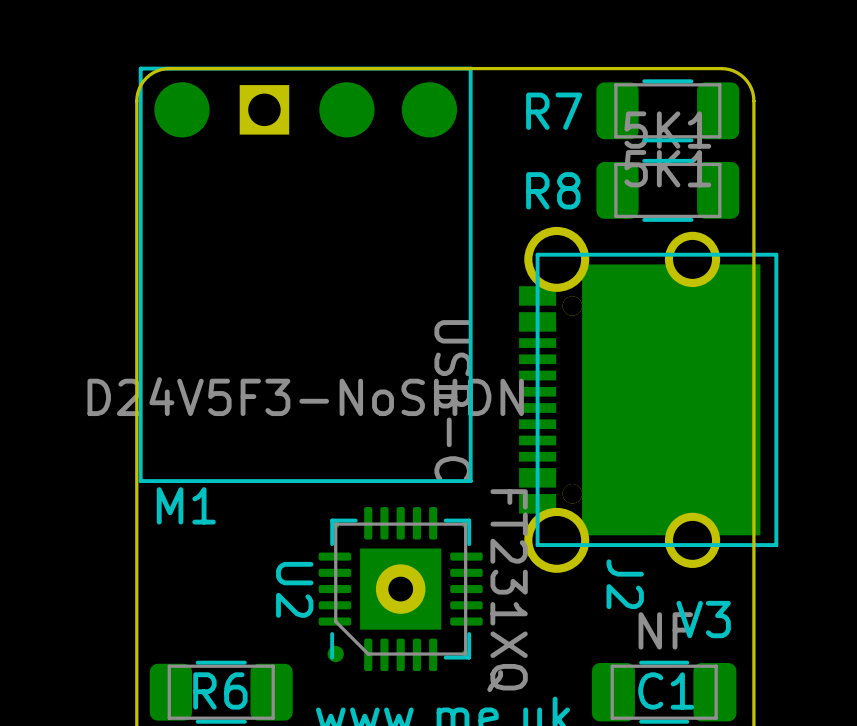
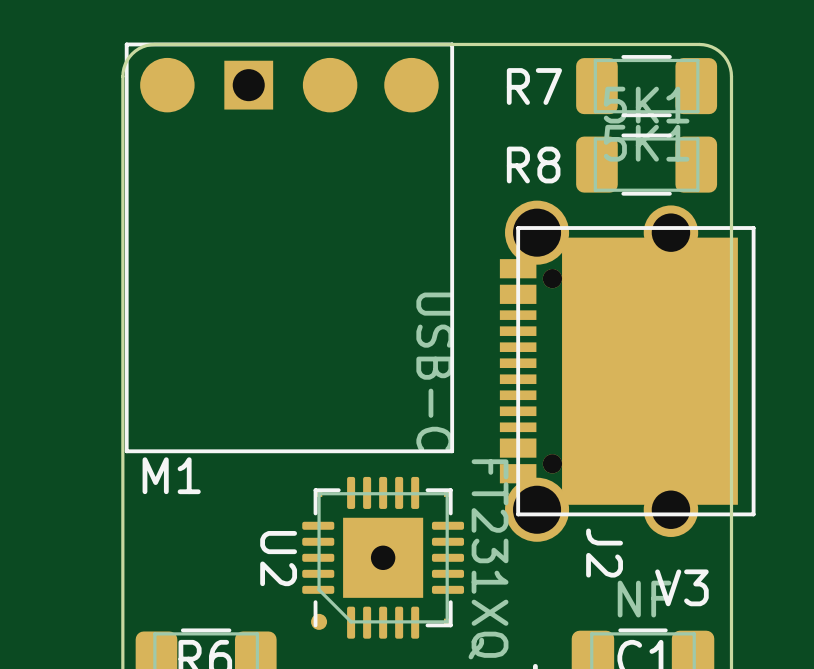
M1 value: D24V5F3-NoSHDN (305, 396) -> none

